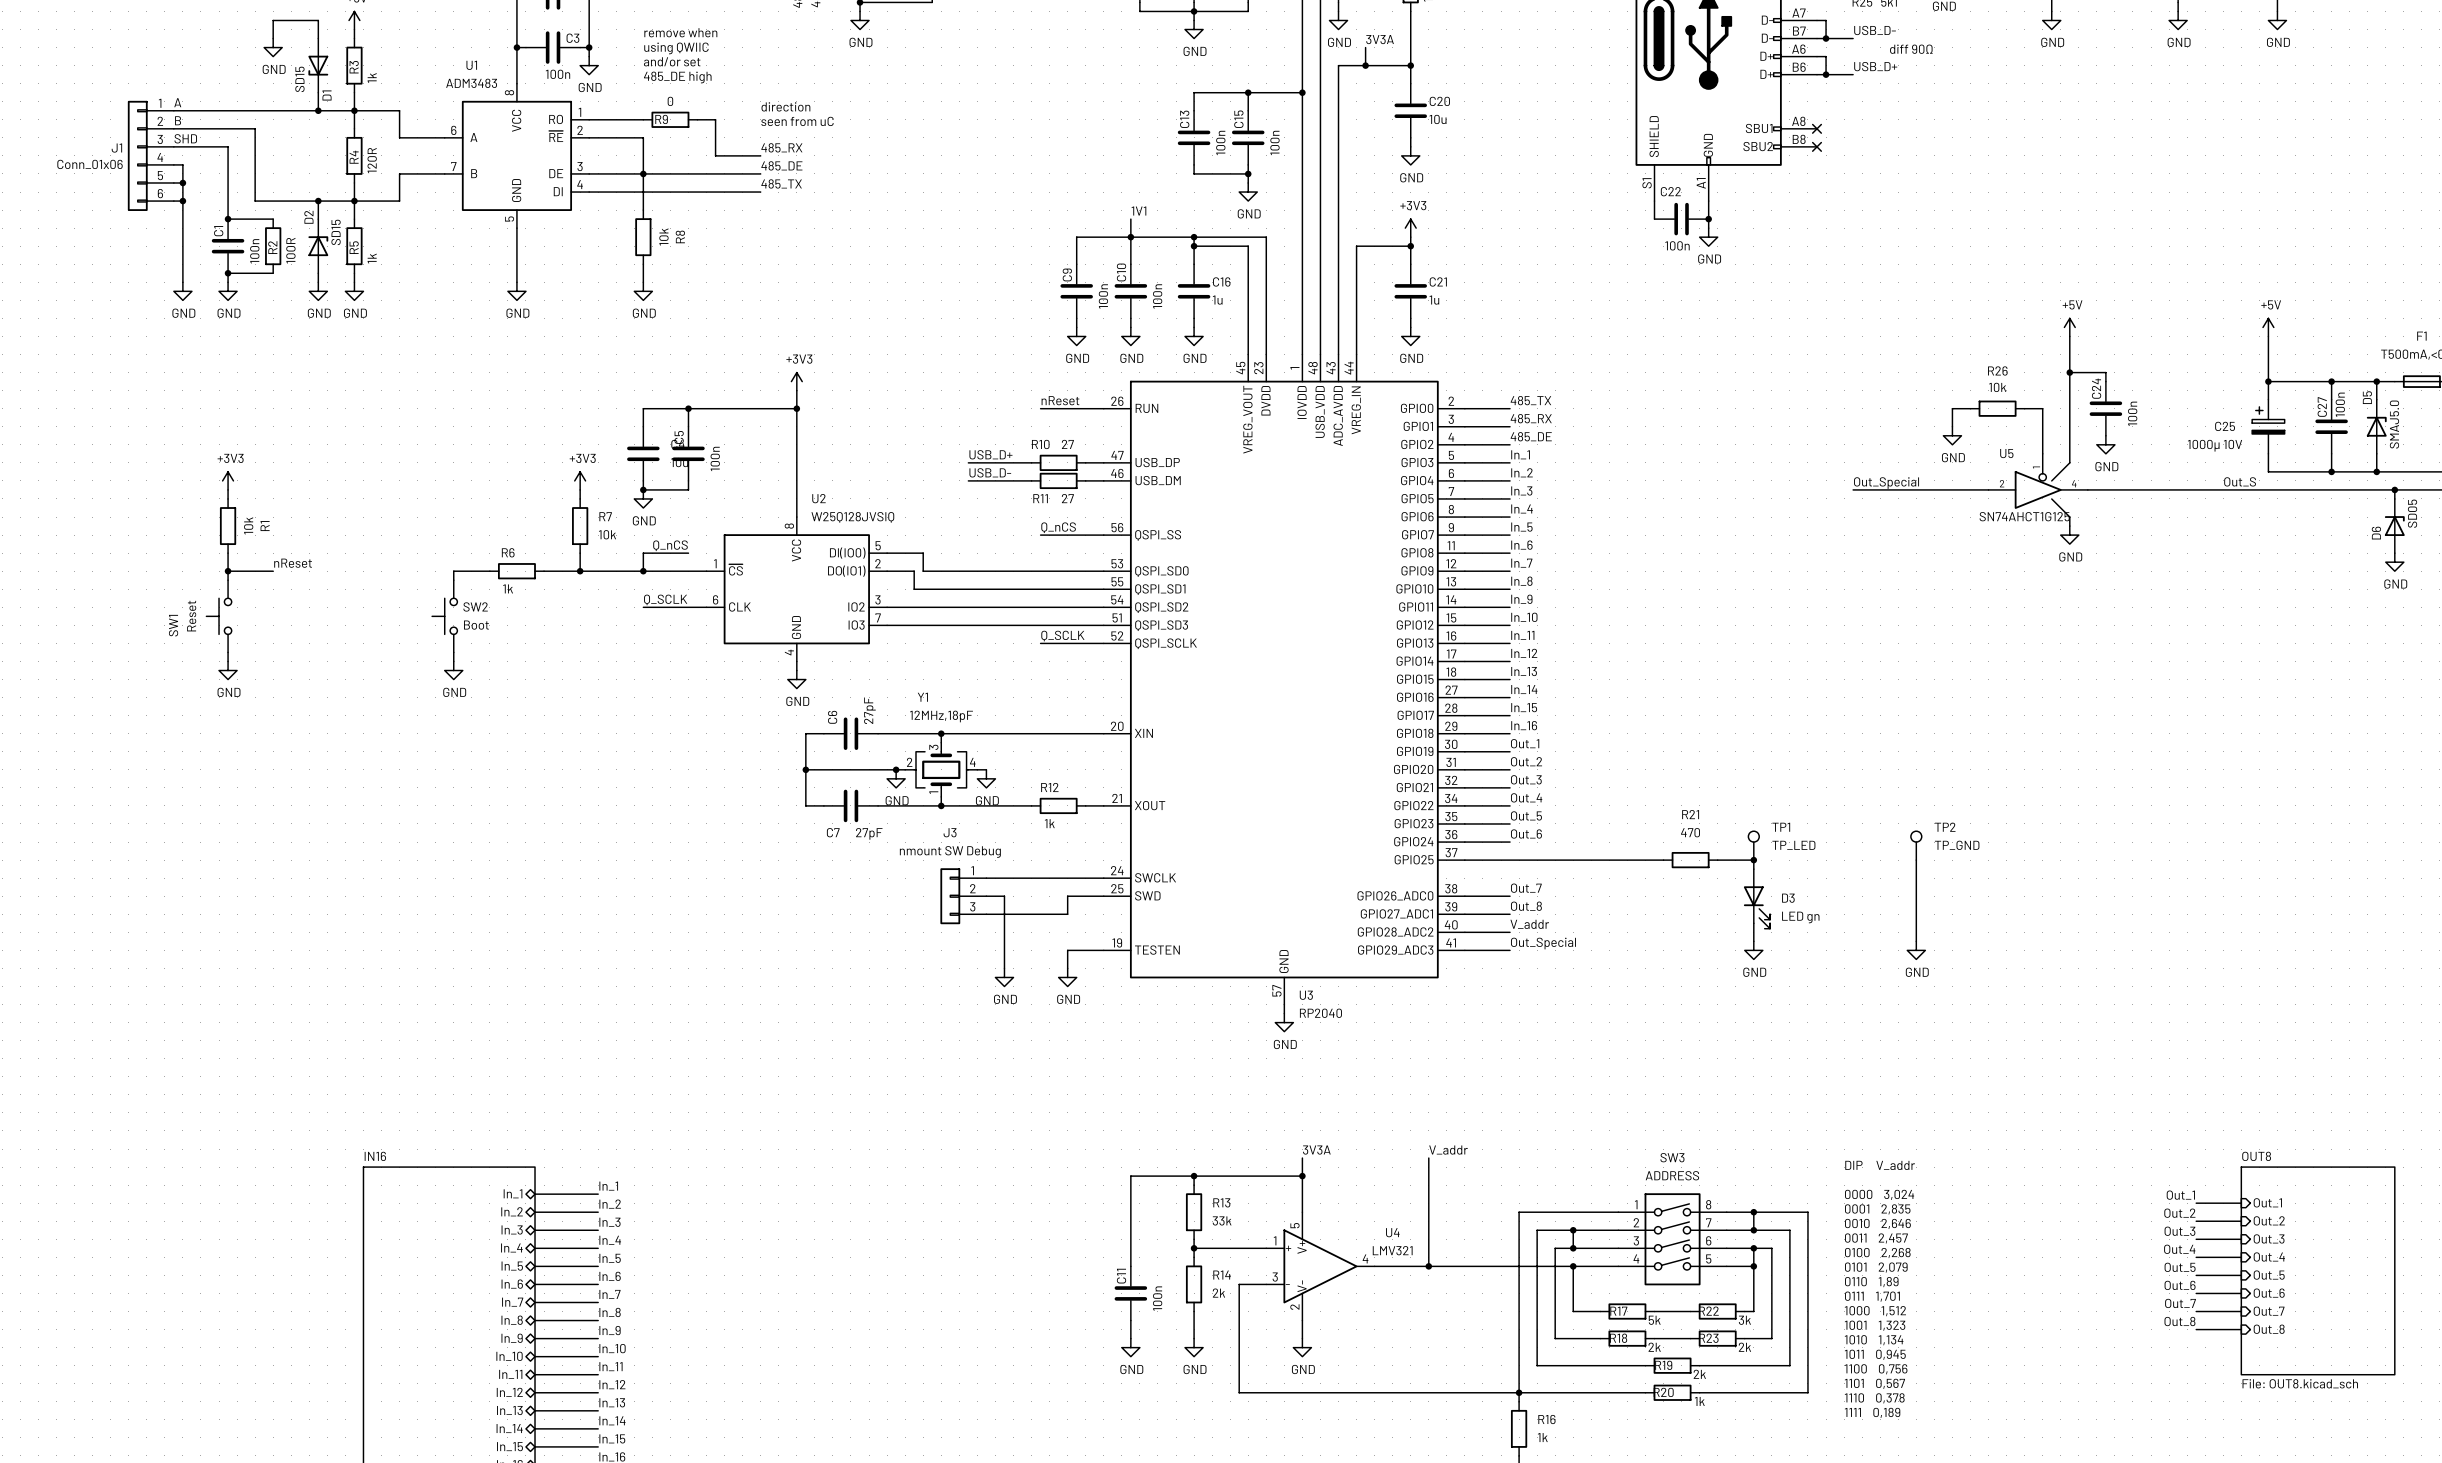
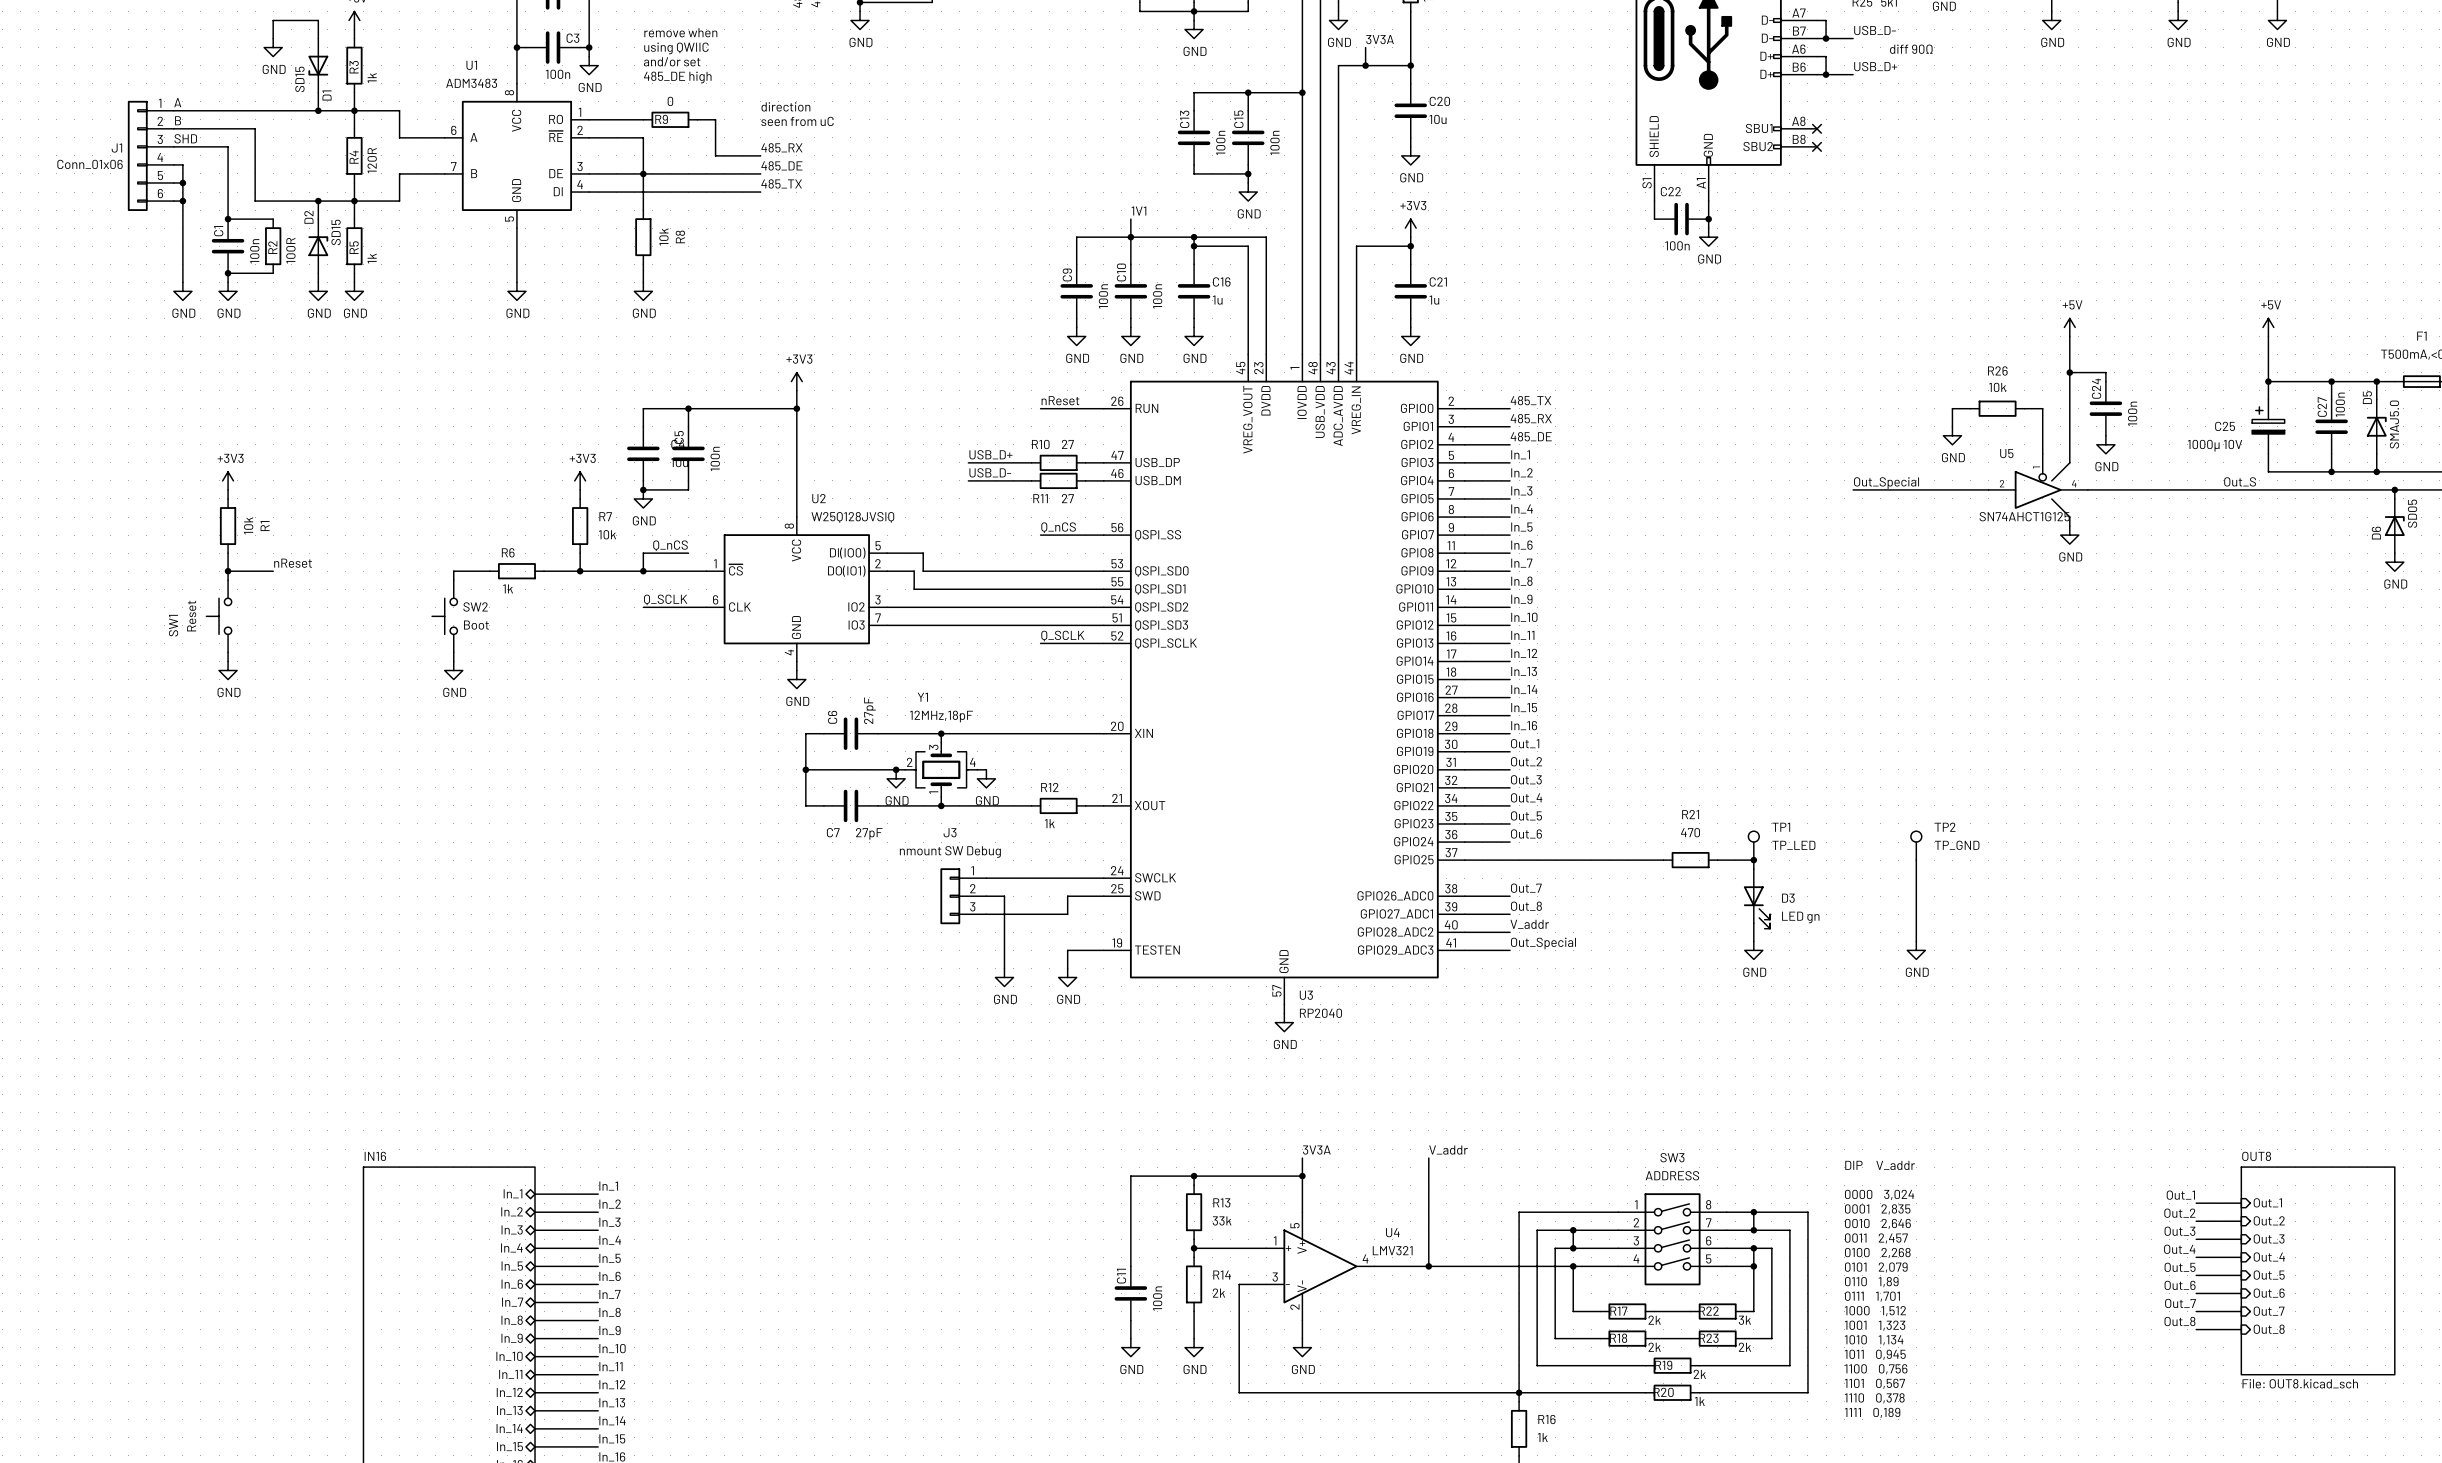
R17 value: 5k (1654, 1320) -> 2k (1654, 1320)

